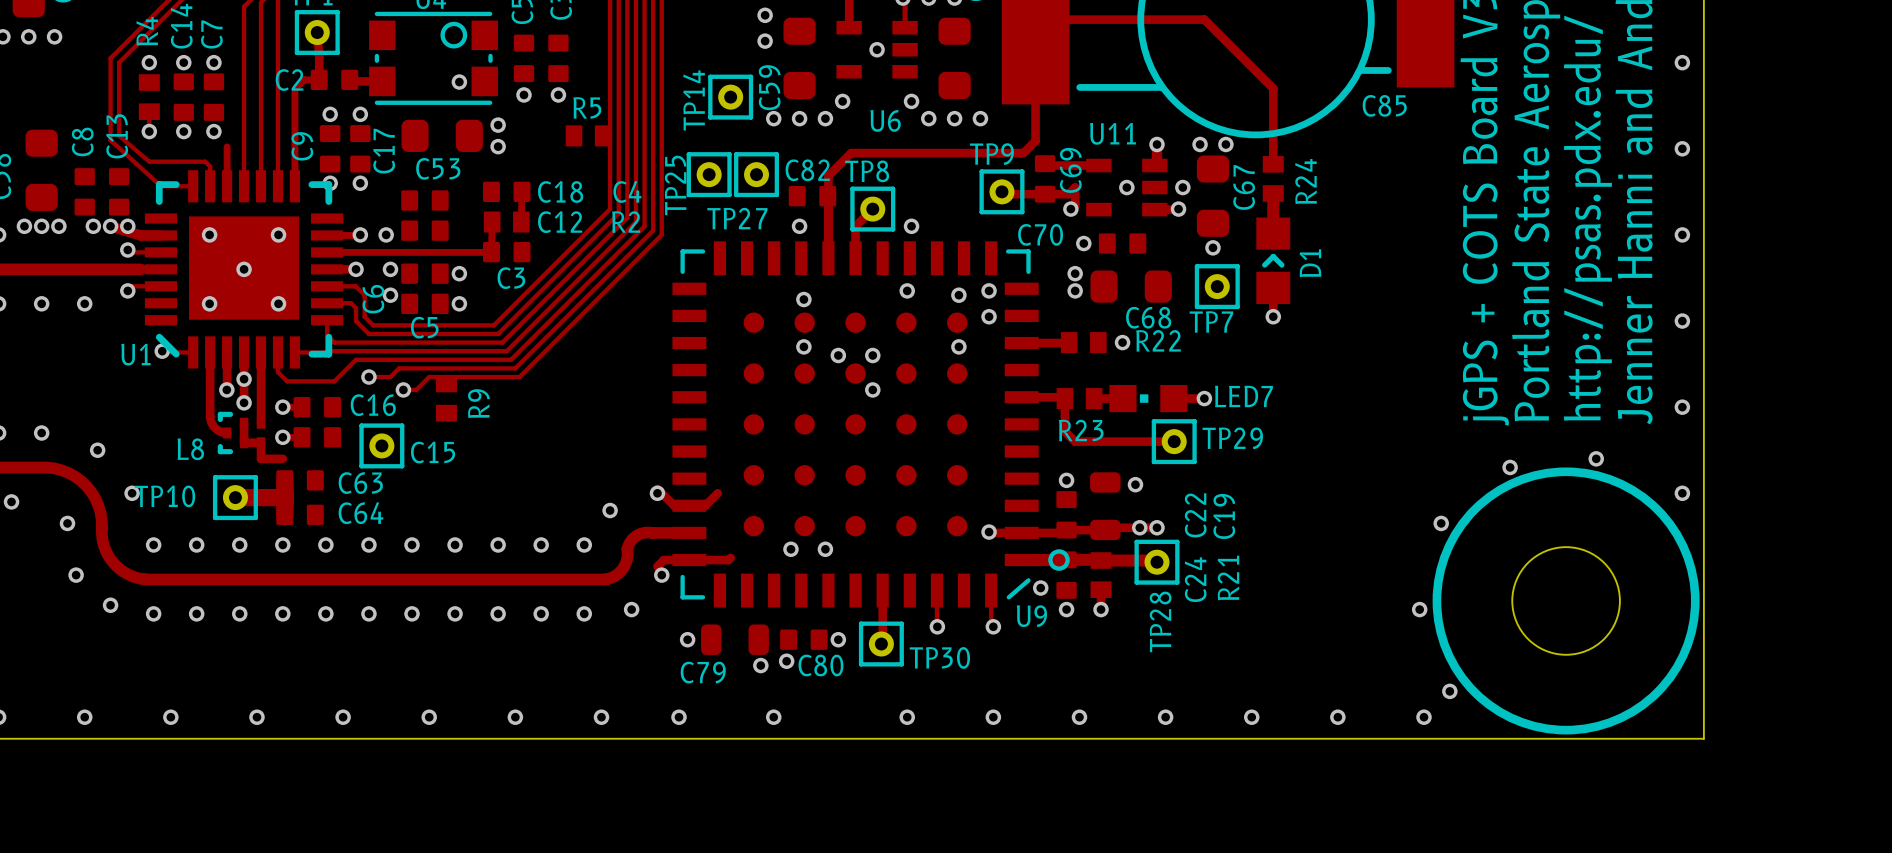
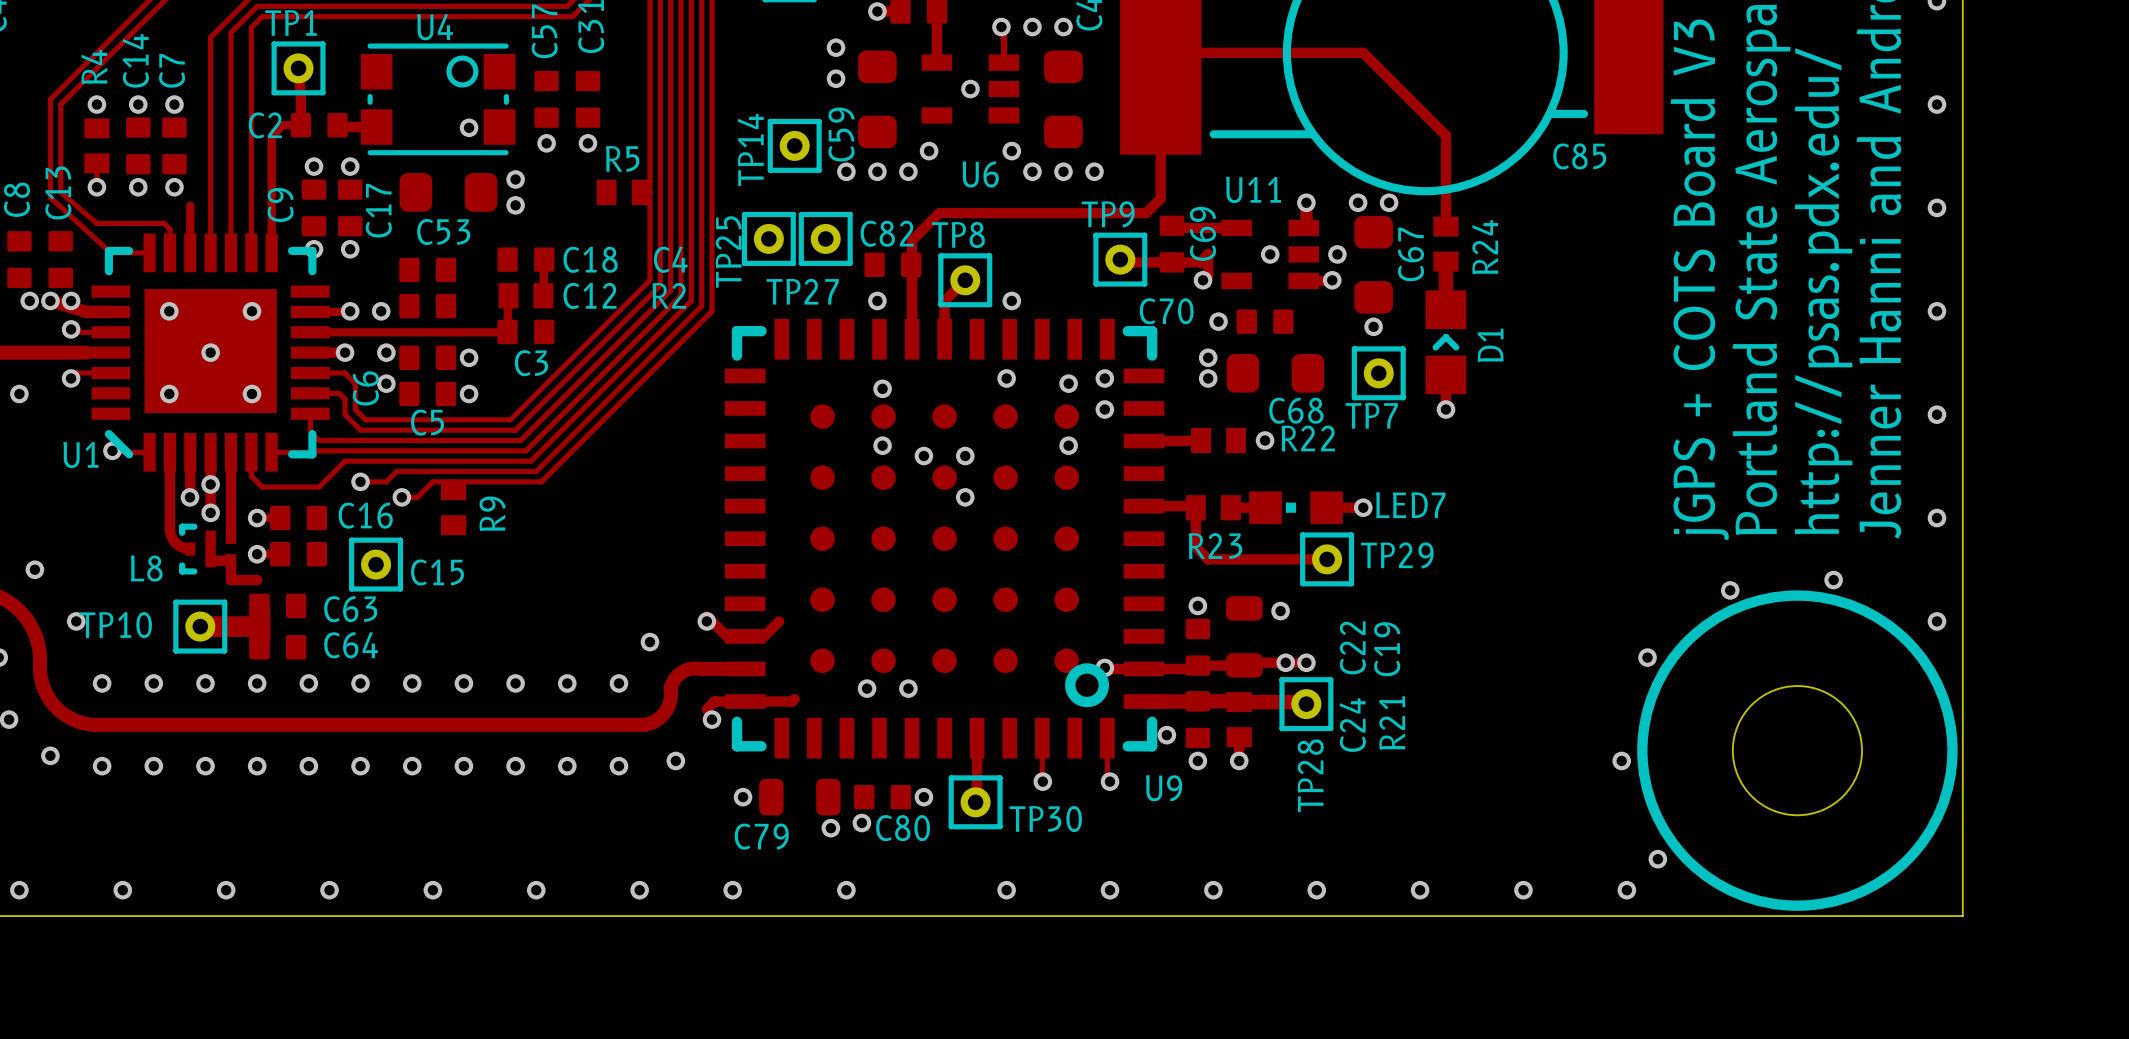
U9 footprint: [672, 241, 1070, 608] -> [724, 318, 1165, 759]

